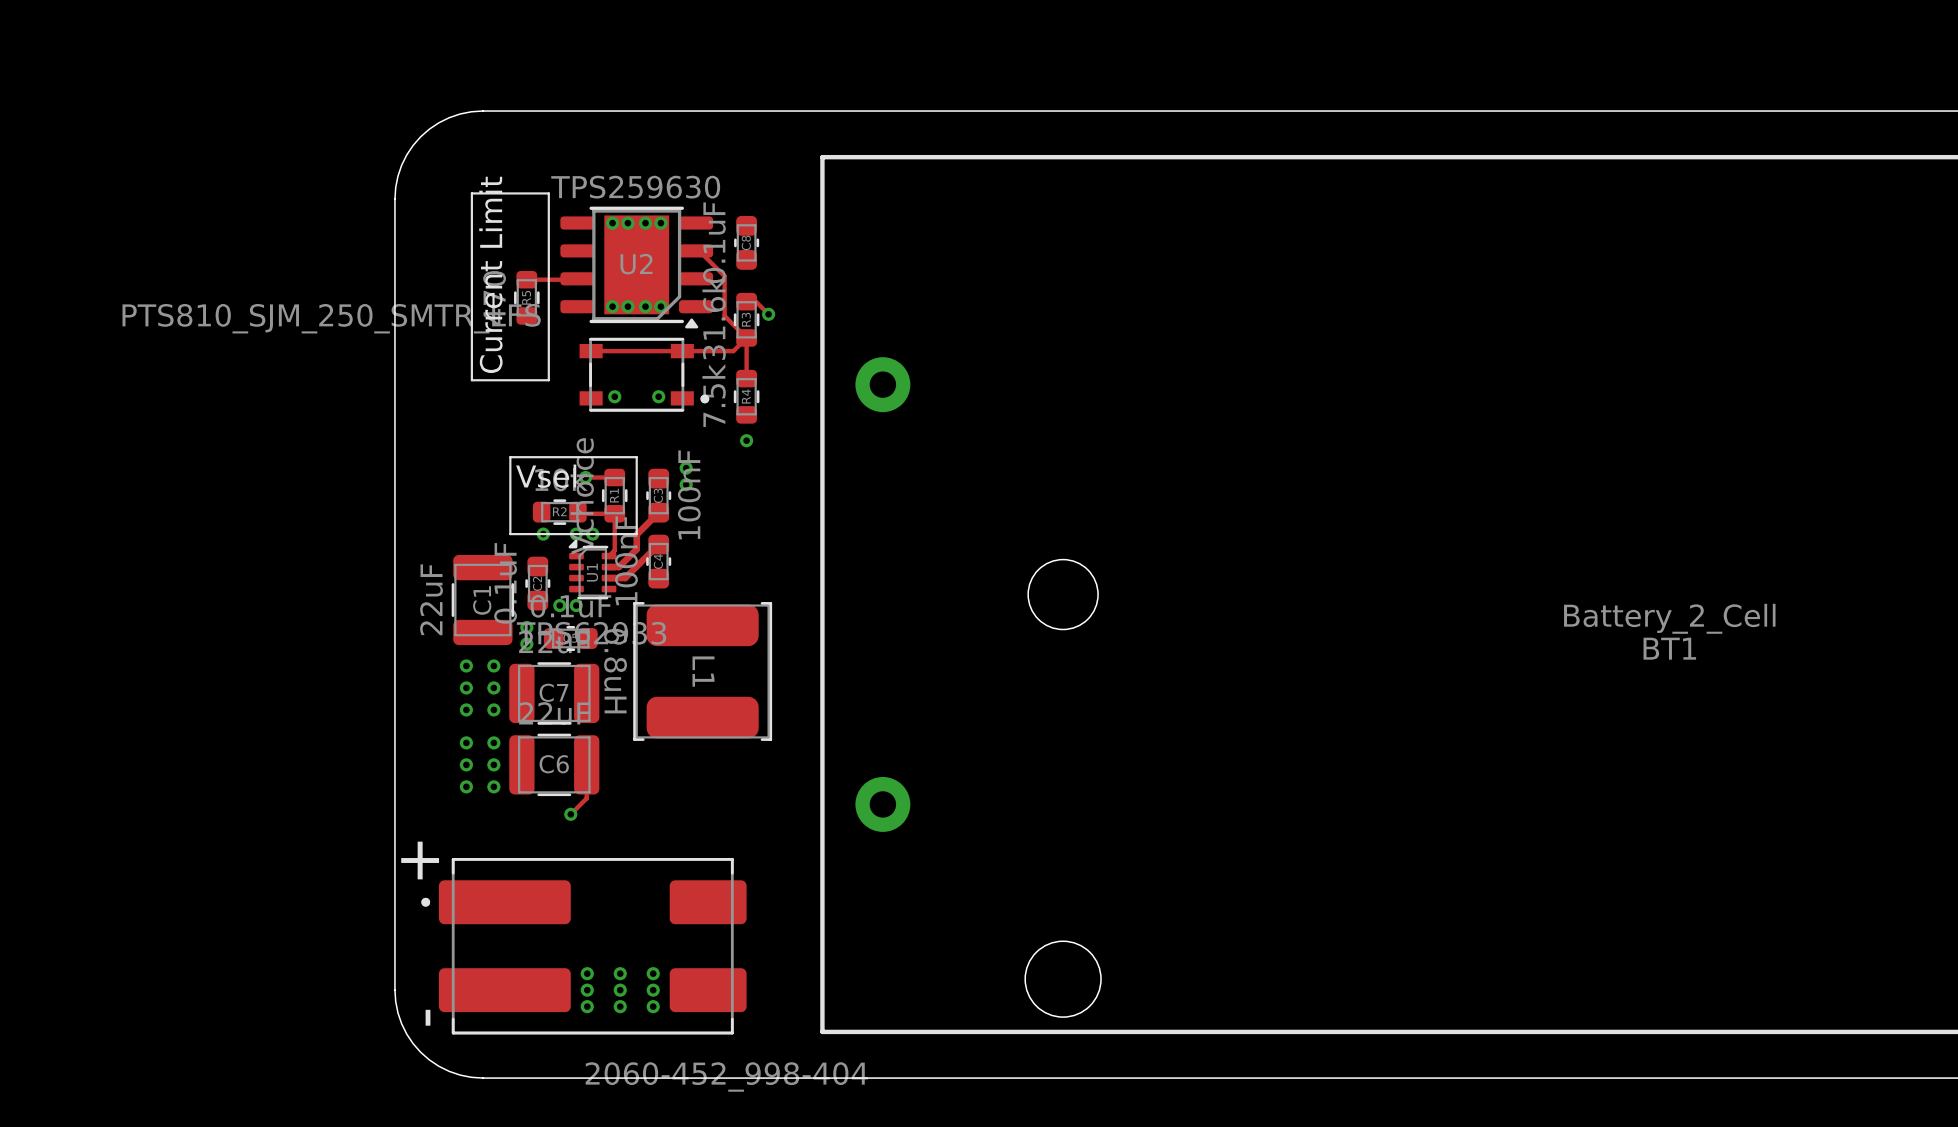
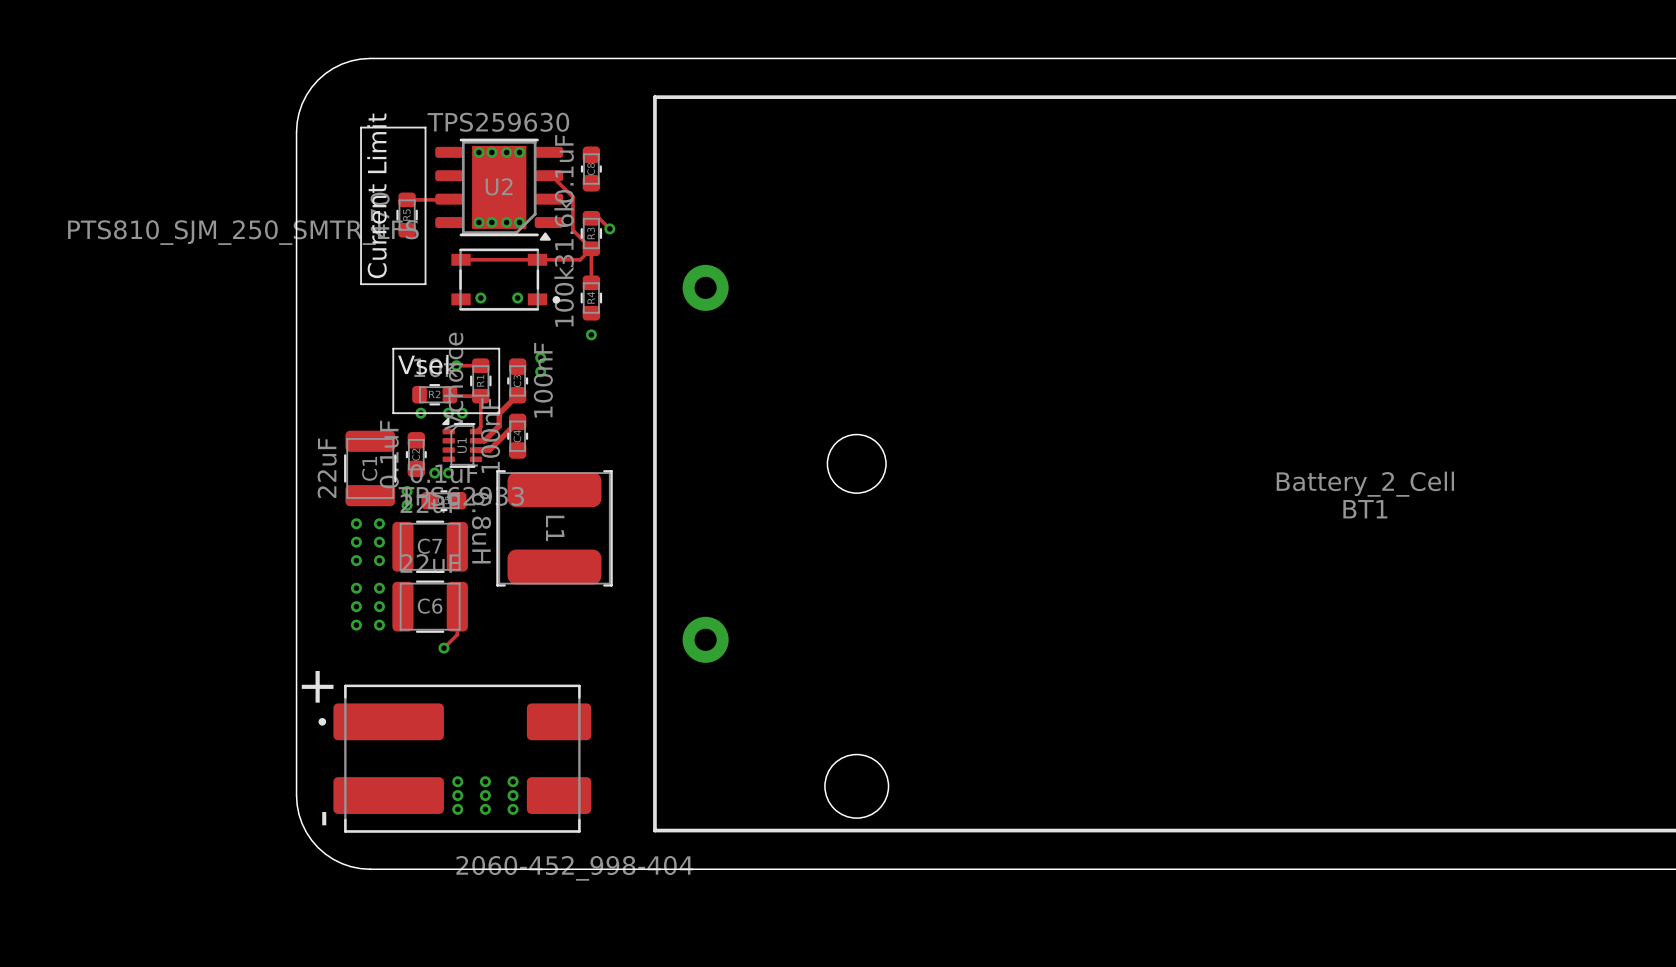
R4 value: 7.5k (714, 395) -> 100k (564, 296)

